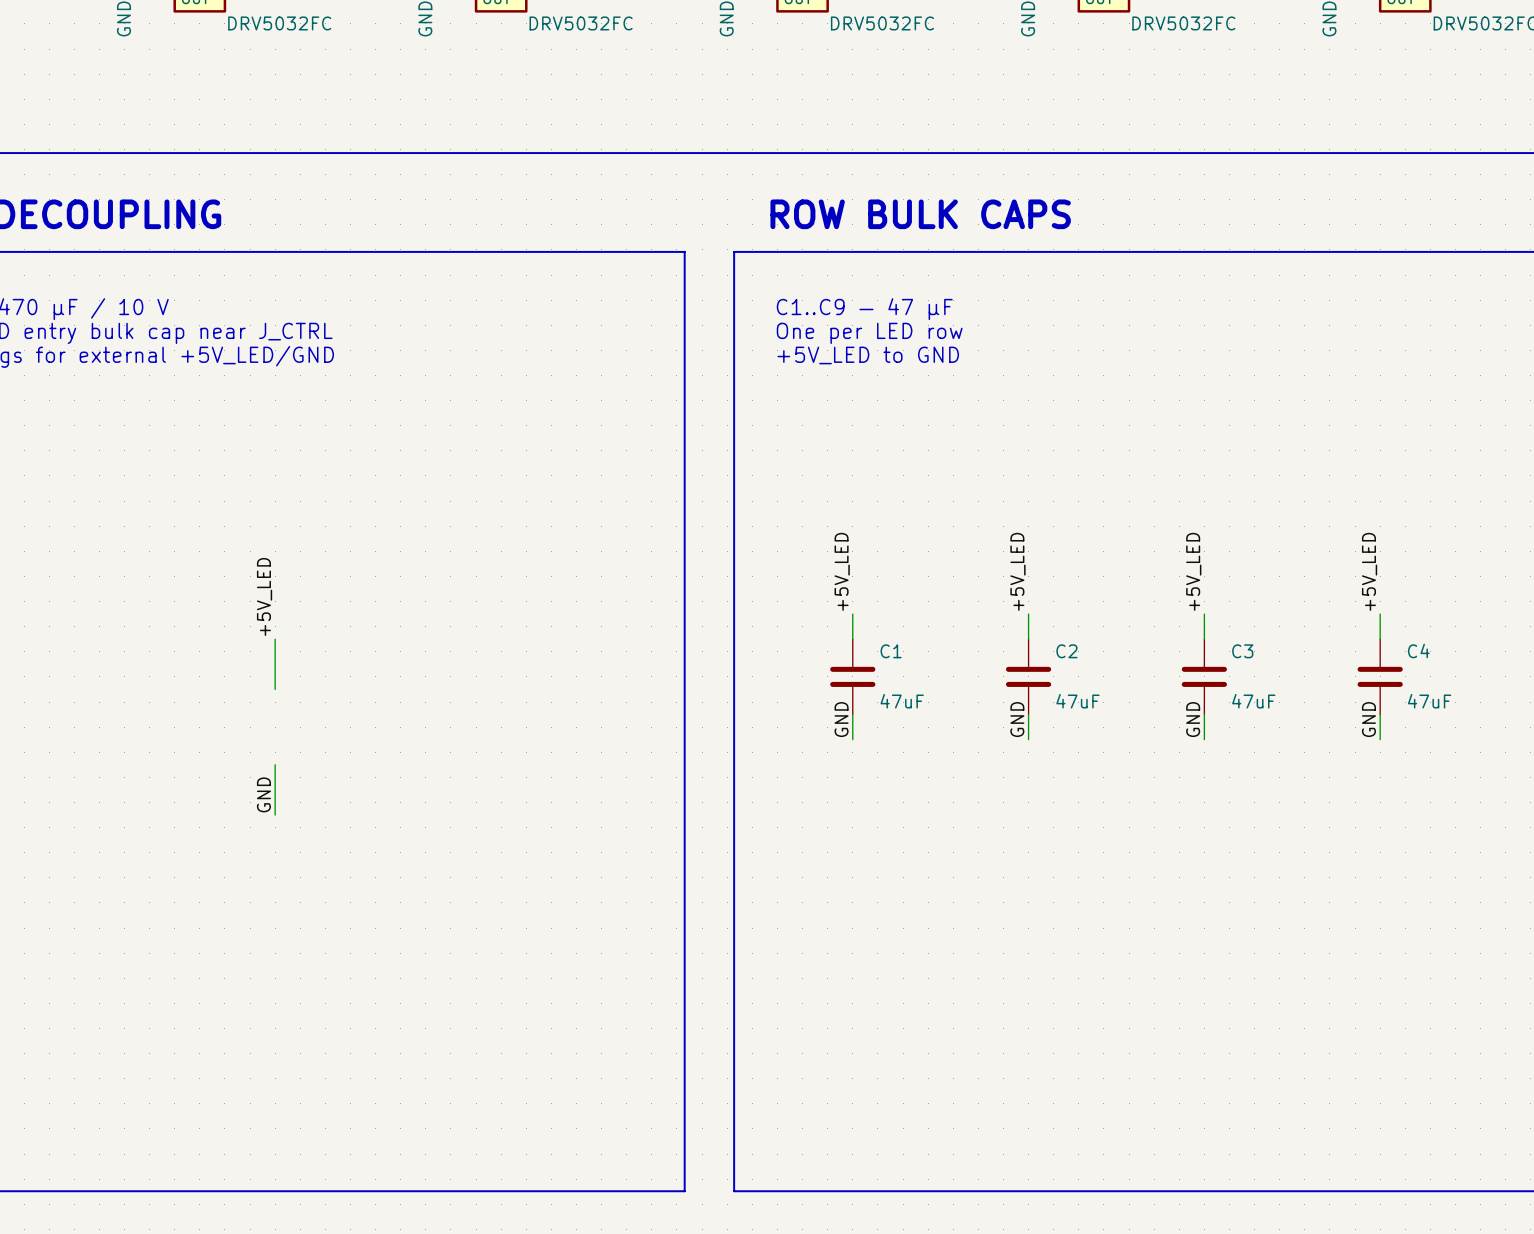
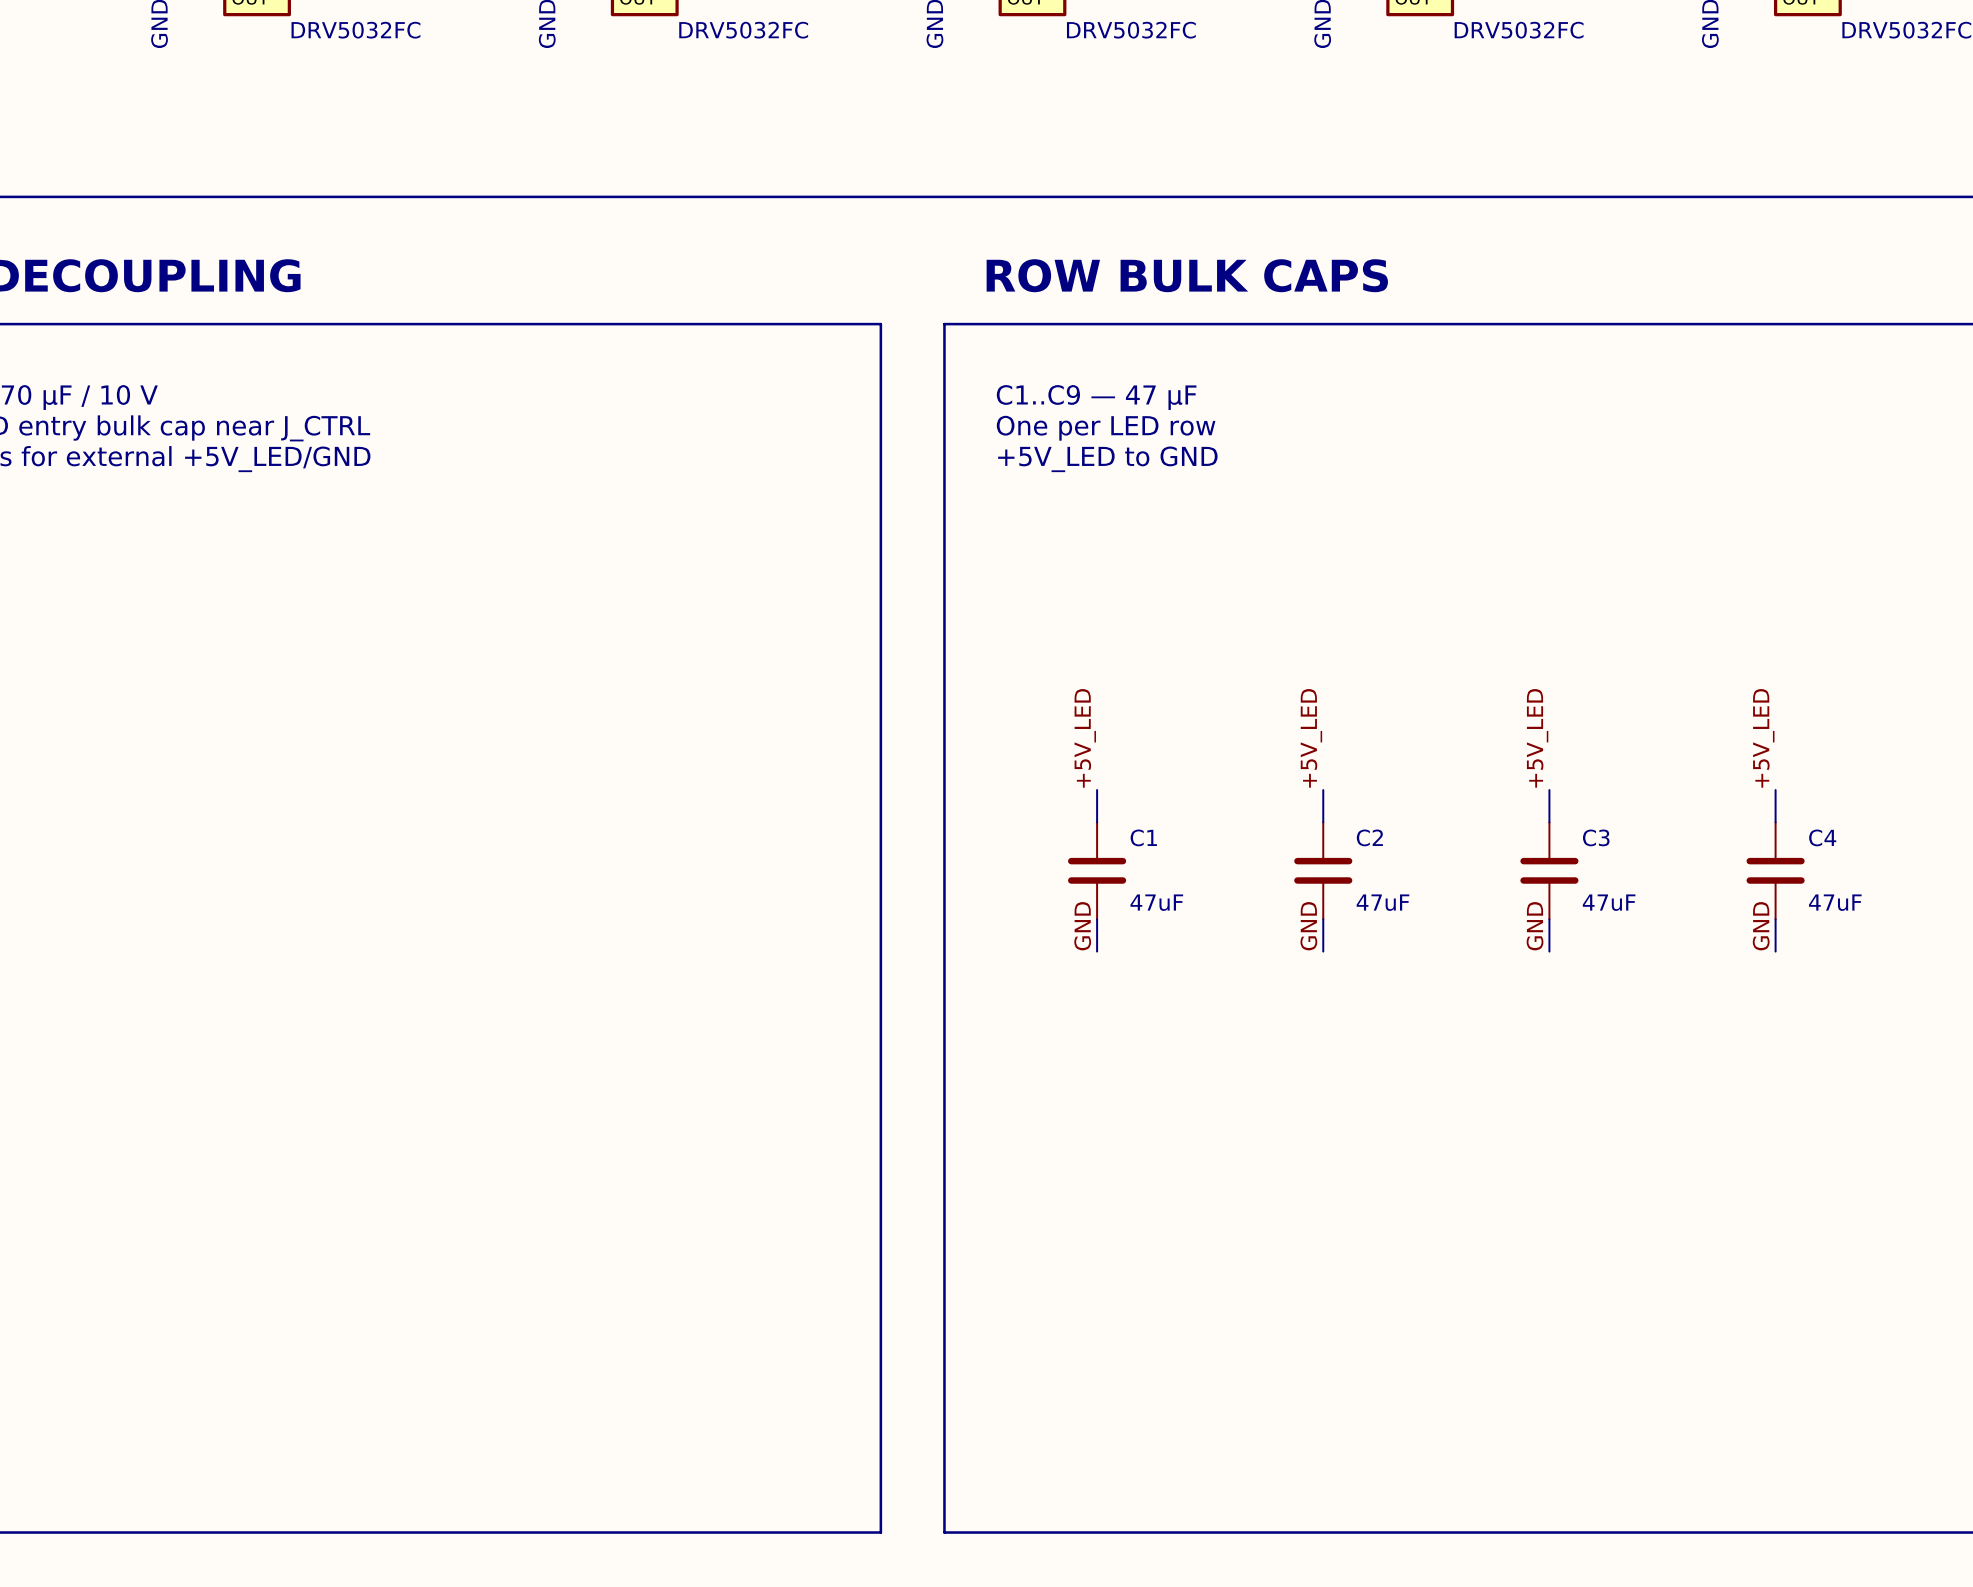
label: +5V_LED (264, 596) -> none
wire: (275, 639) (275, 689) -> none
wire: (275, 764) (275, 815) -> none
label: GND (263, 794) -> none

